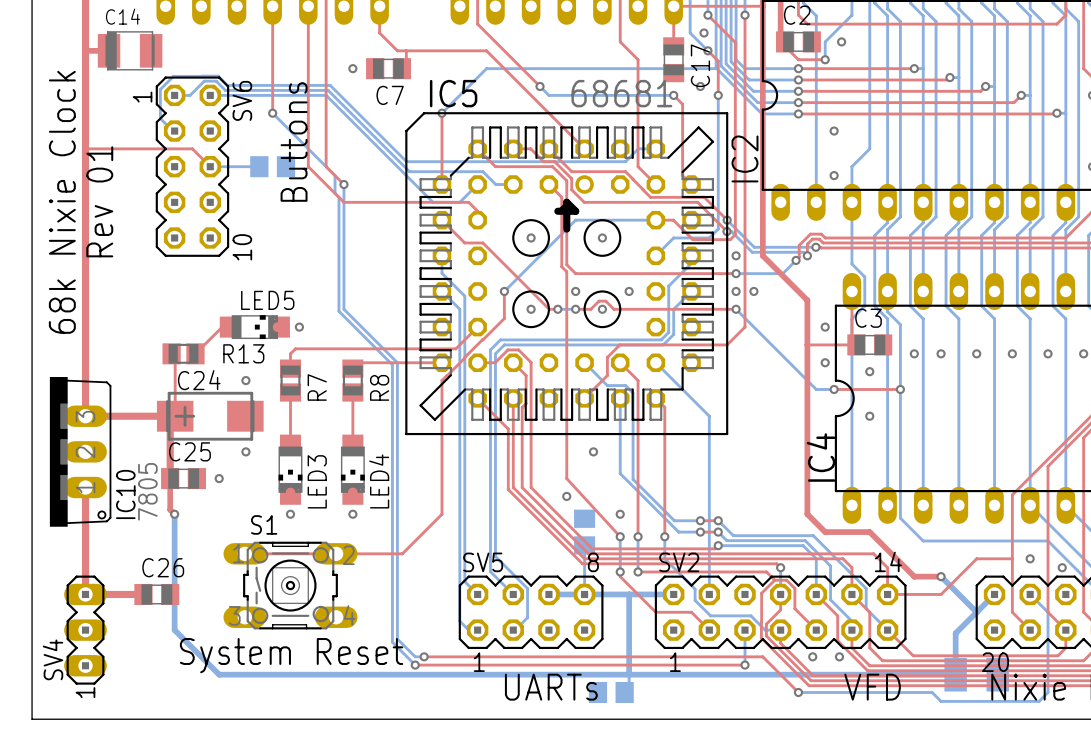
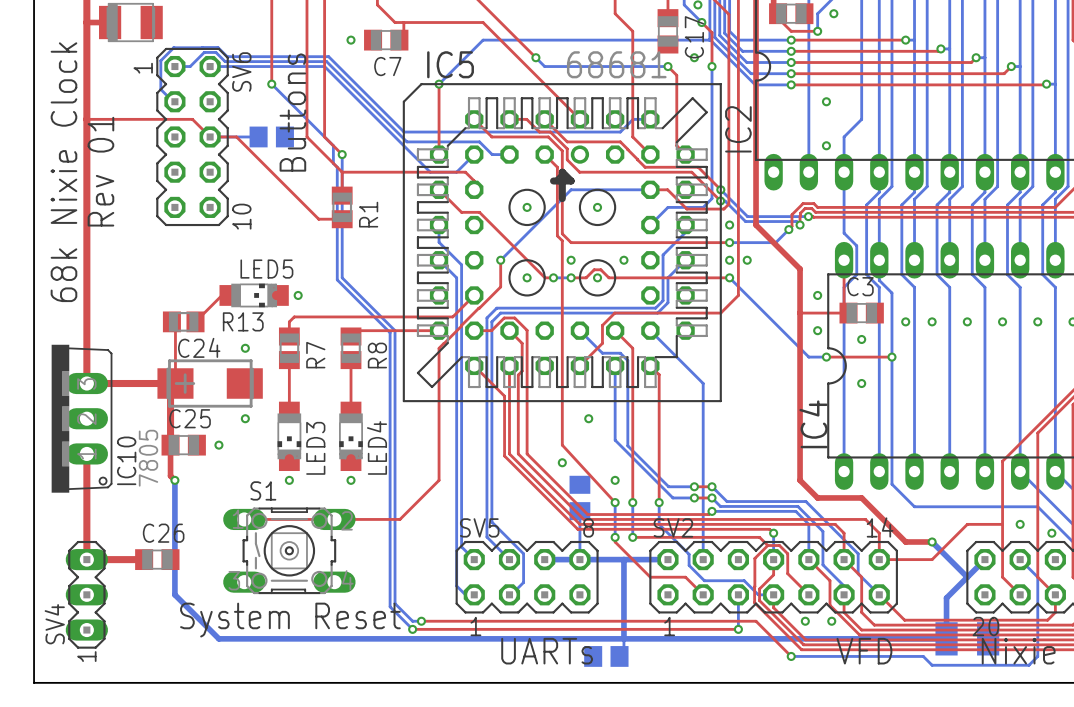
top track: none -> (210, 136) (236, 136) (318, 219) (342, 219)
top track: none -> (342, 172) (342, 195)
R1: none -> (342, 207)

